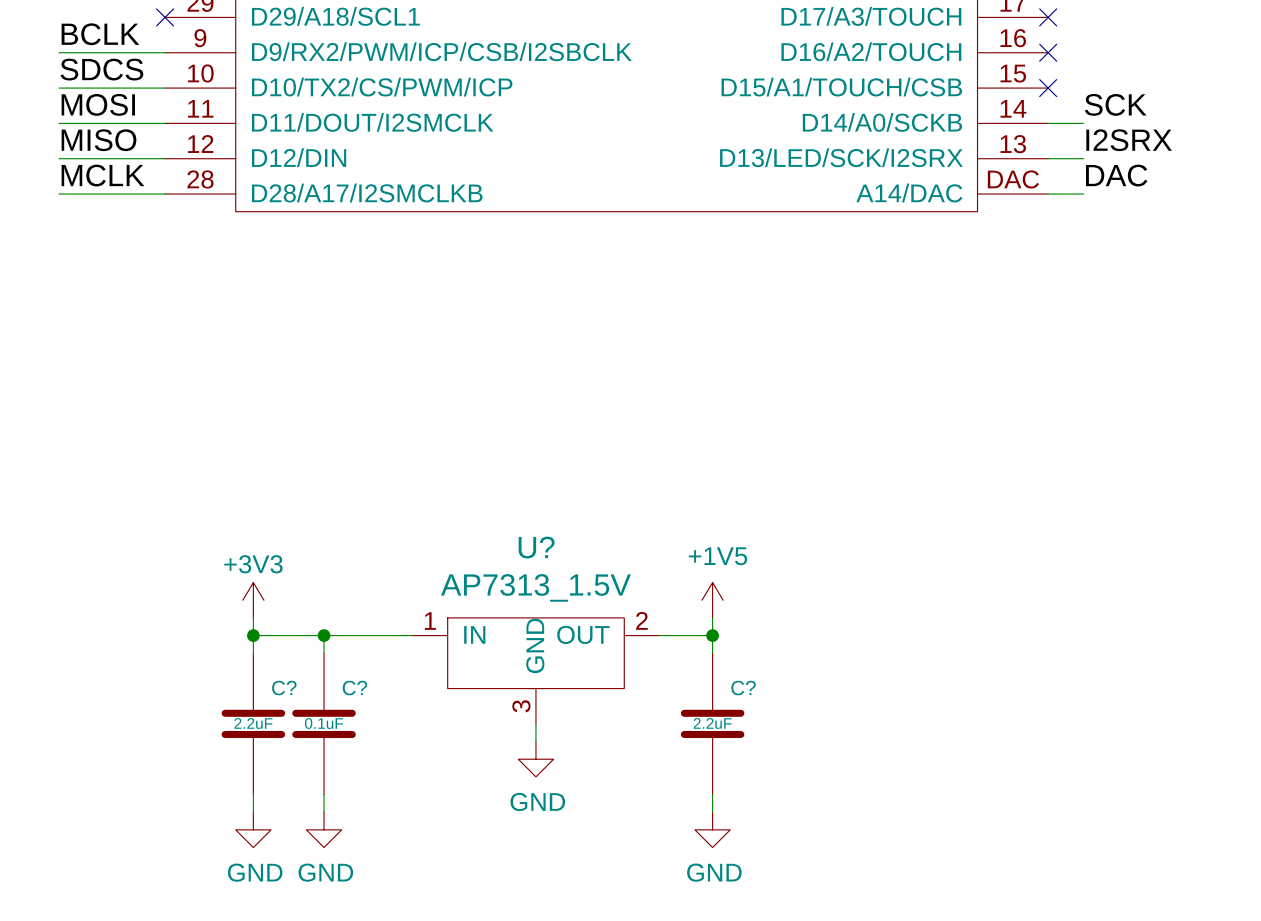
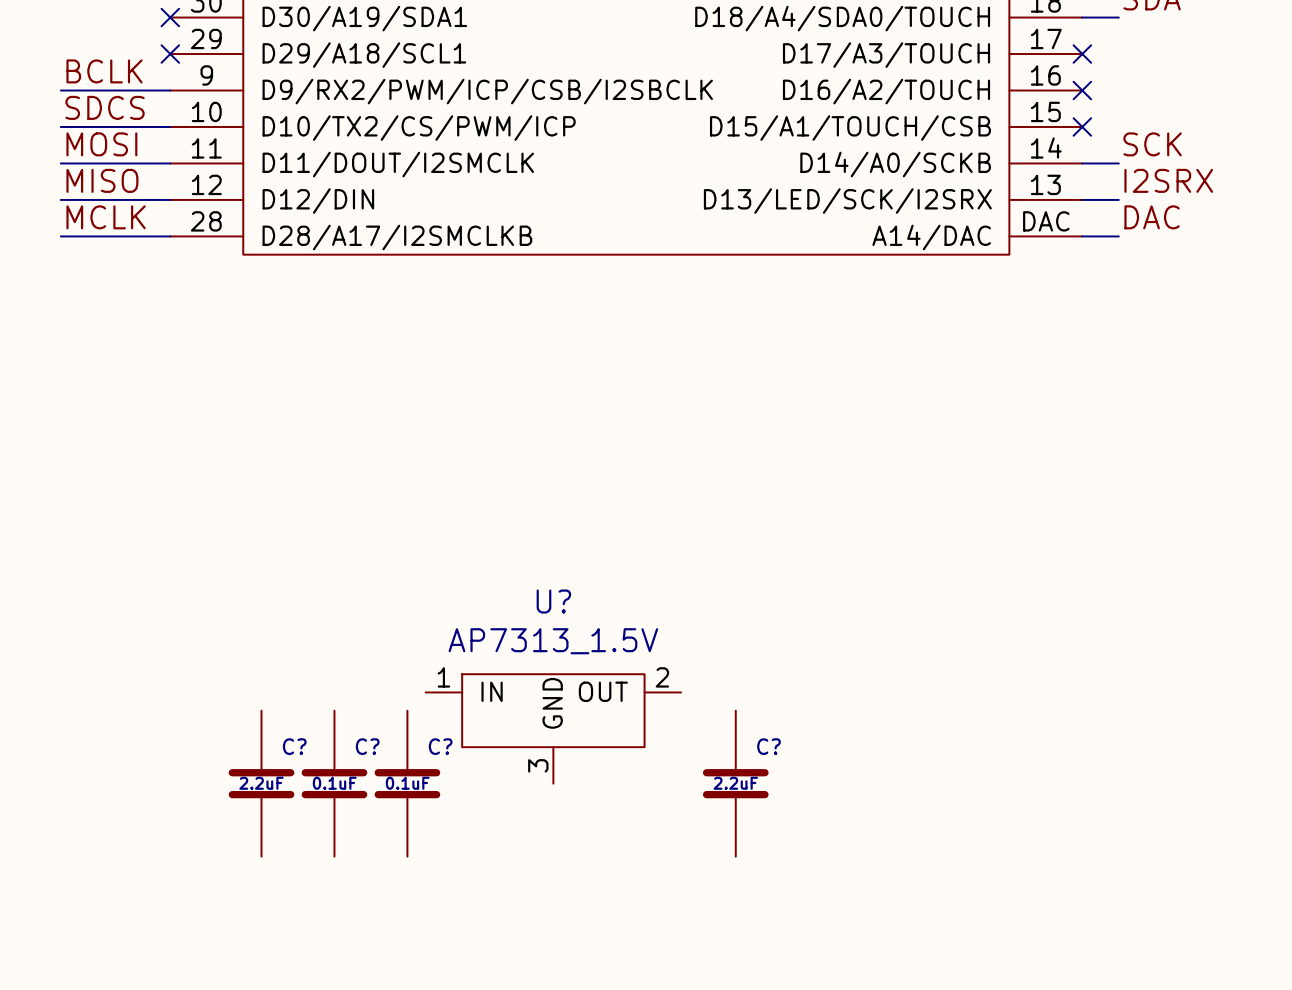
power symbol: +3V3 (253, 600) -> none
power symbol: +1V5 (712, 600) -> none
wire: (253, 617) (253, 653) -> none
wire: (712, 617) (712, 653) -> none
wire: (253, 635) (412, 635) -> none
junction: (253, 635) -> none
wire: (324, 635) (324, 653) -> none
junction: (324, 635) -> none
wire: (659, 635) (712, 635) -> none
junction: (712, 635) -> none
C?: none -> 0.1uF (407, 783)
wire: (535, 723) (535, 741) -> none
power symbol: GND (535, 759) -> none
wire: (253, 794) (253, 812) -> none
wire: (324, 794) (324, 812) -> none
wire: (712, 794) (712, 812) -> none
power symbol: GND (253, 829) -> none
power symbol: GND (324, 829) -> none
power symbol: GND (712, 829) -> none

